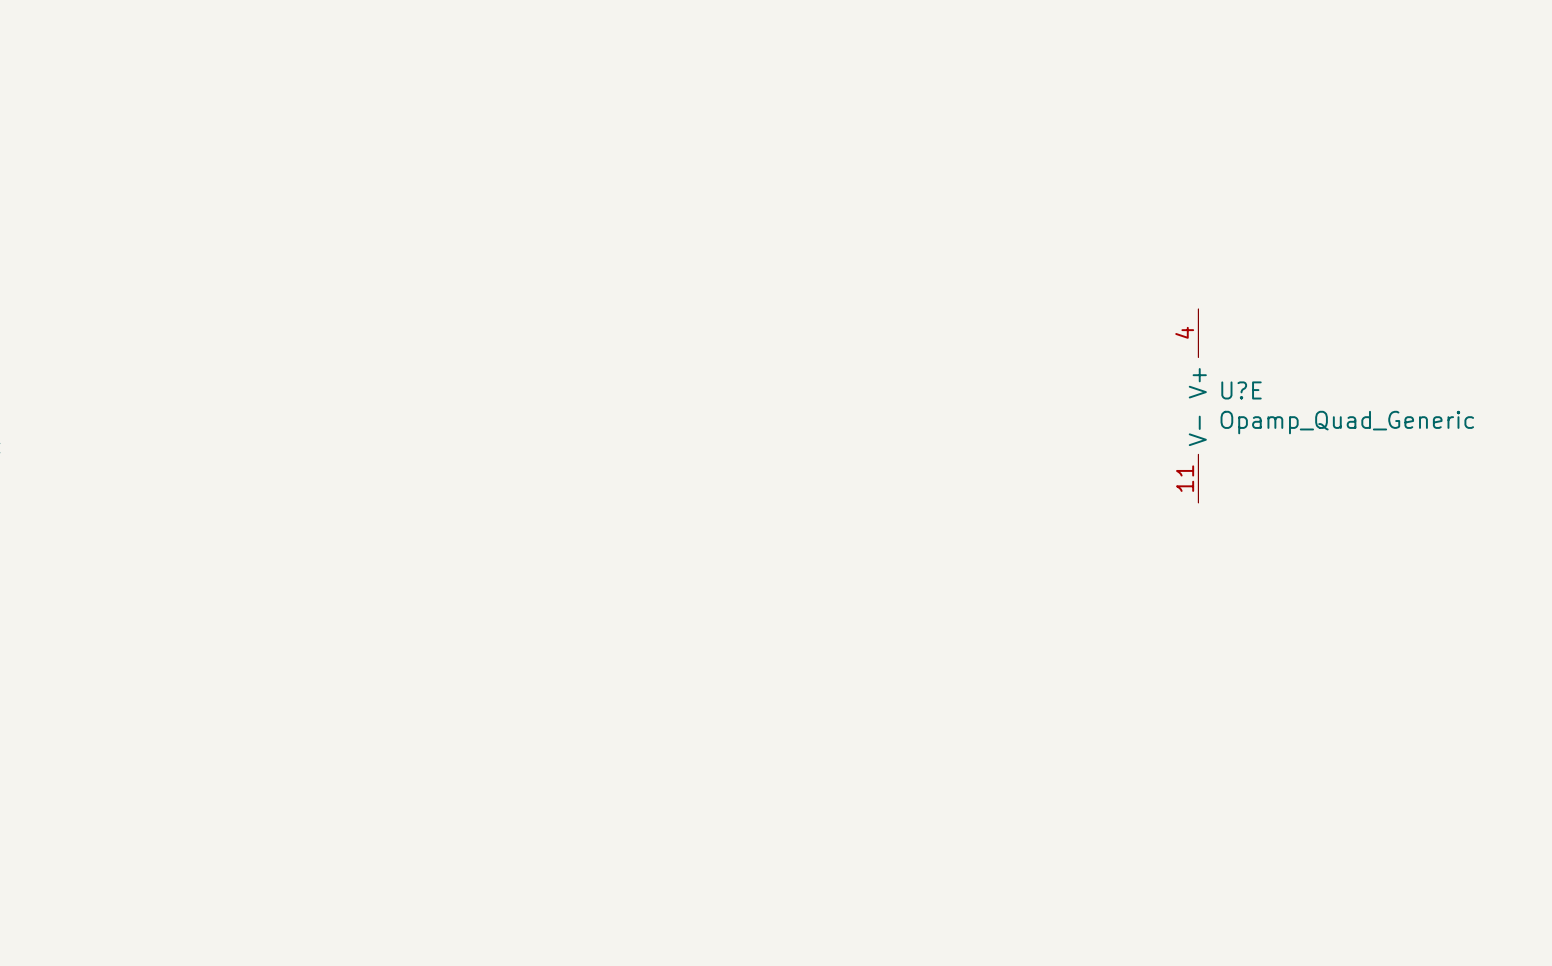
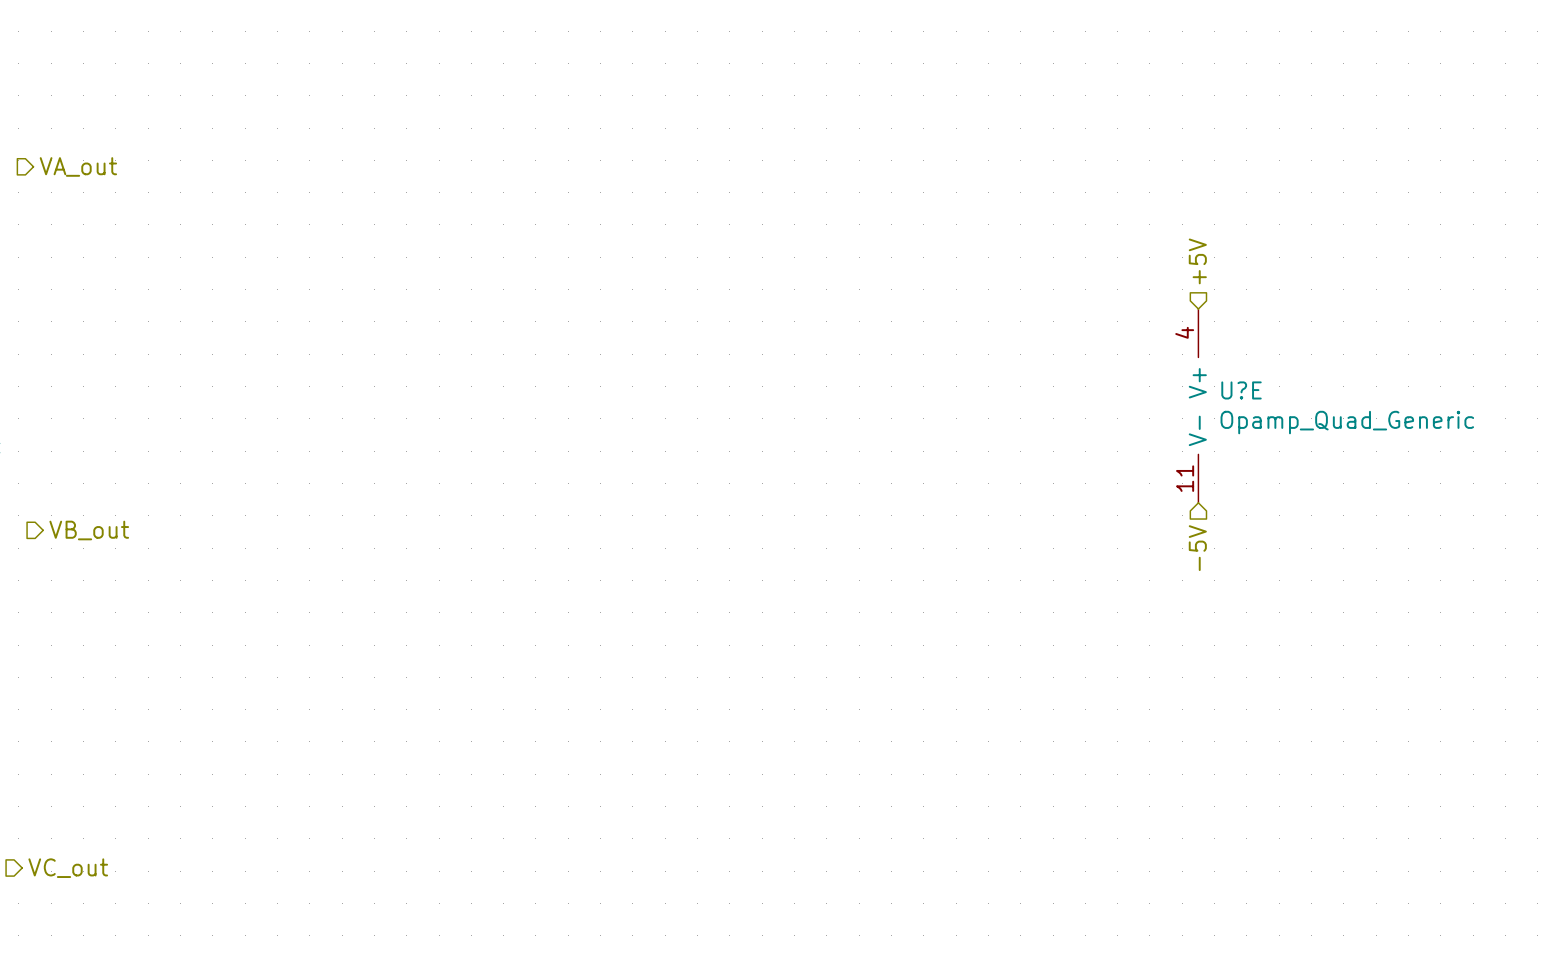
hierarchical label: none -> VA_out (78, 166)
hierarchical label: none -> +5V (1197, 261)
hierarchical label: none -> VB_out (89, 530)
hierarchical label: none -> -5V (1197, 548)
hierarchical label: none -> VC_out (68, 868)

